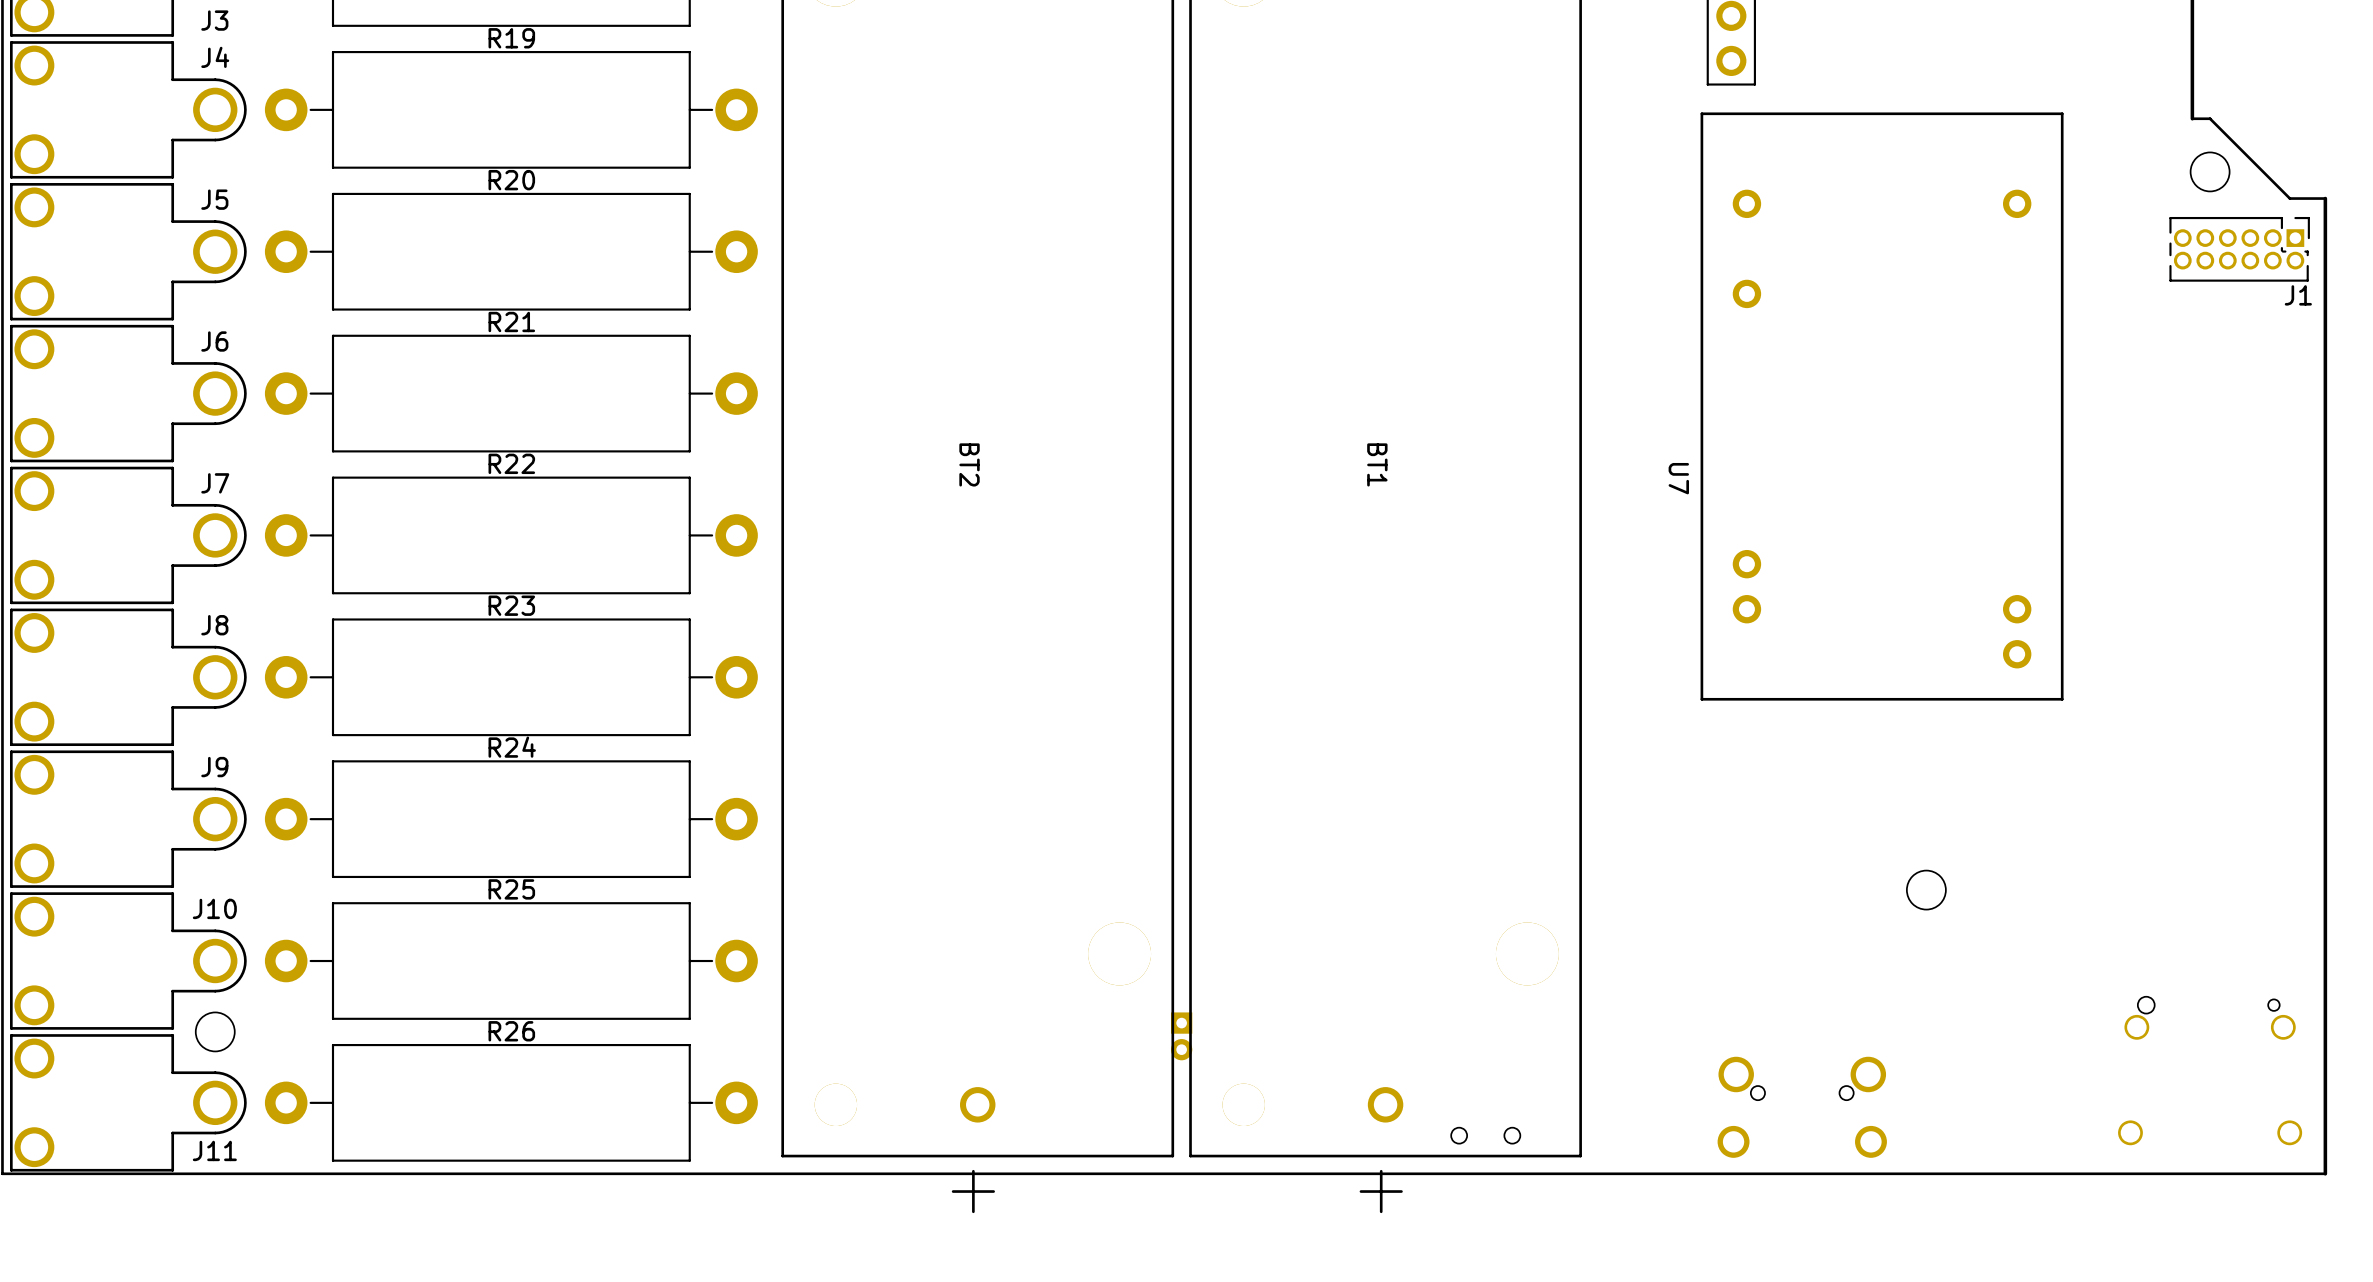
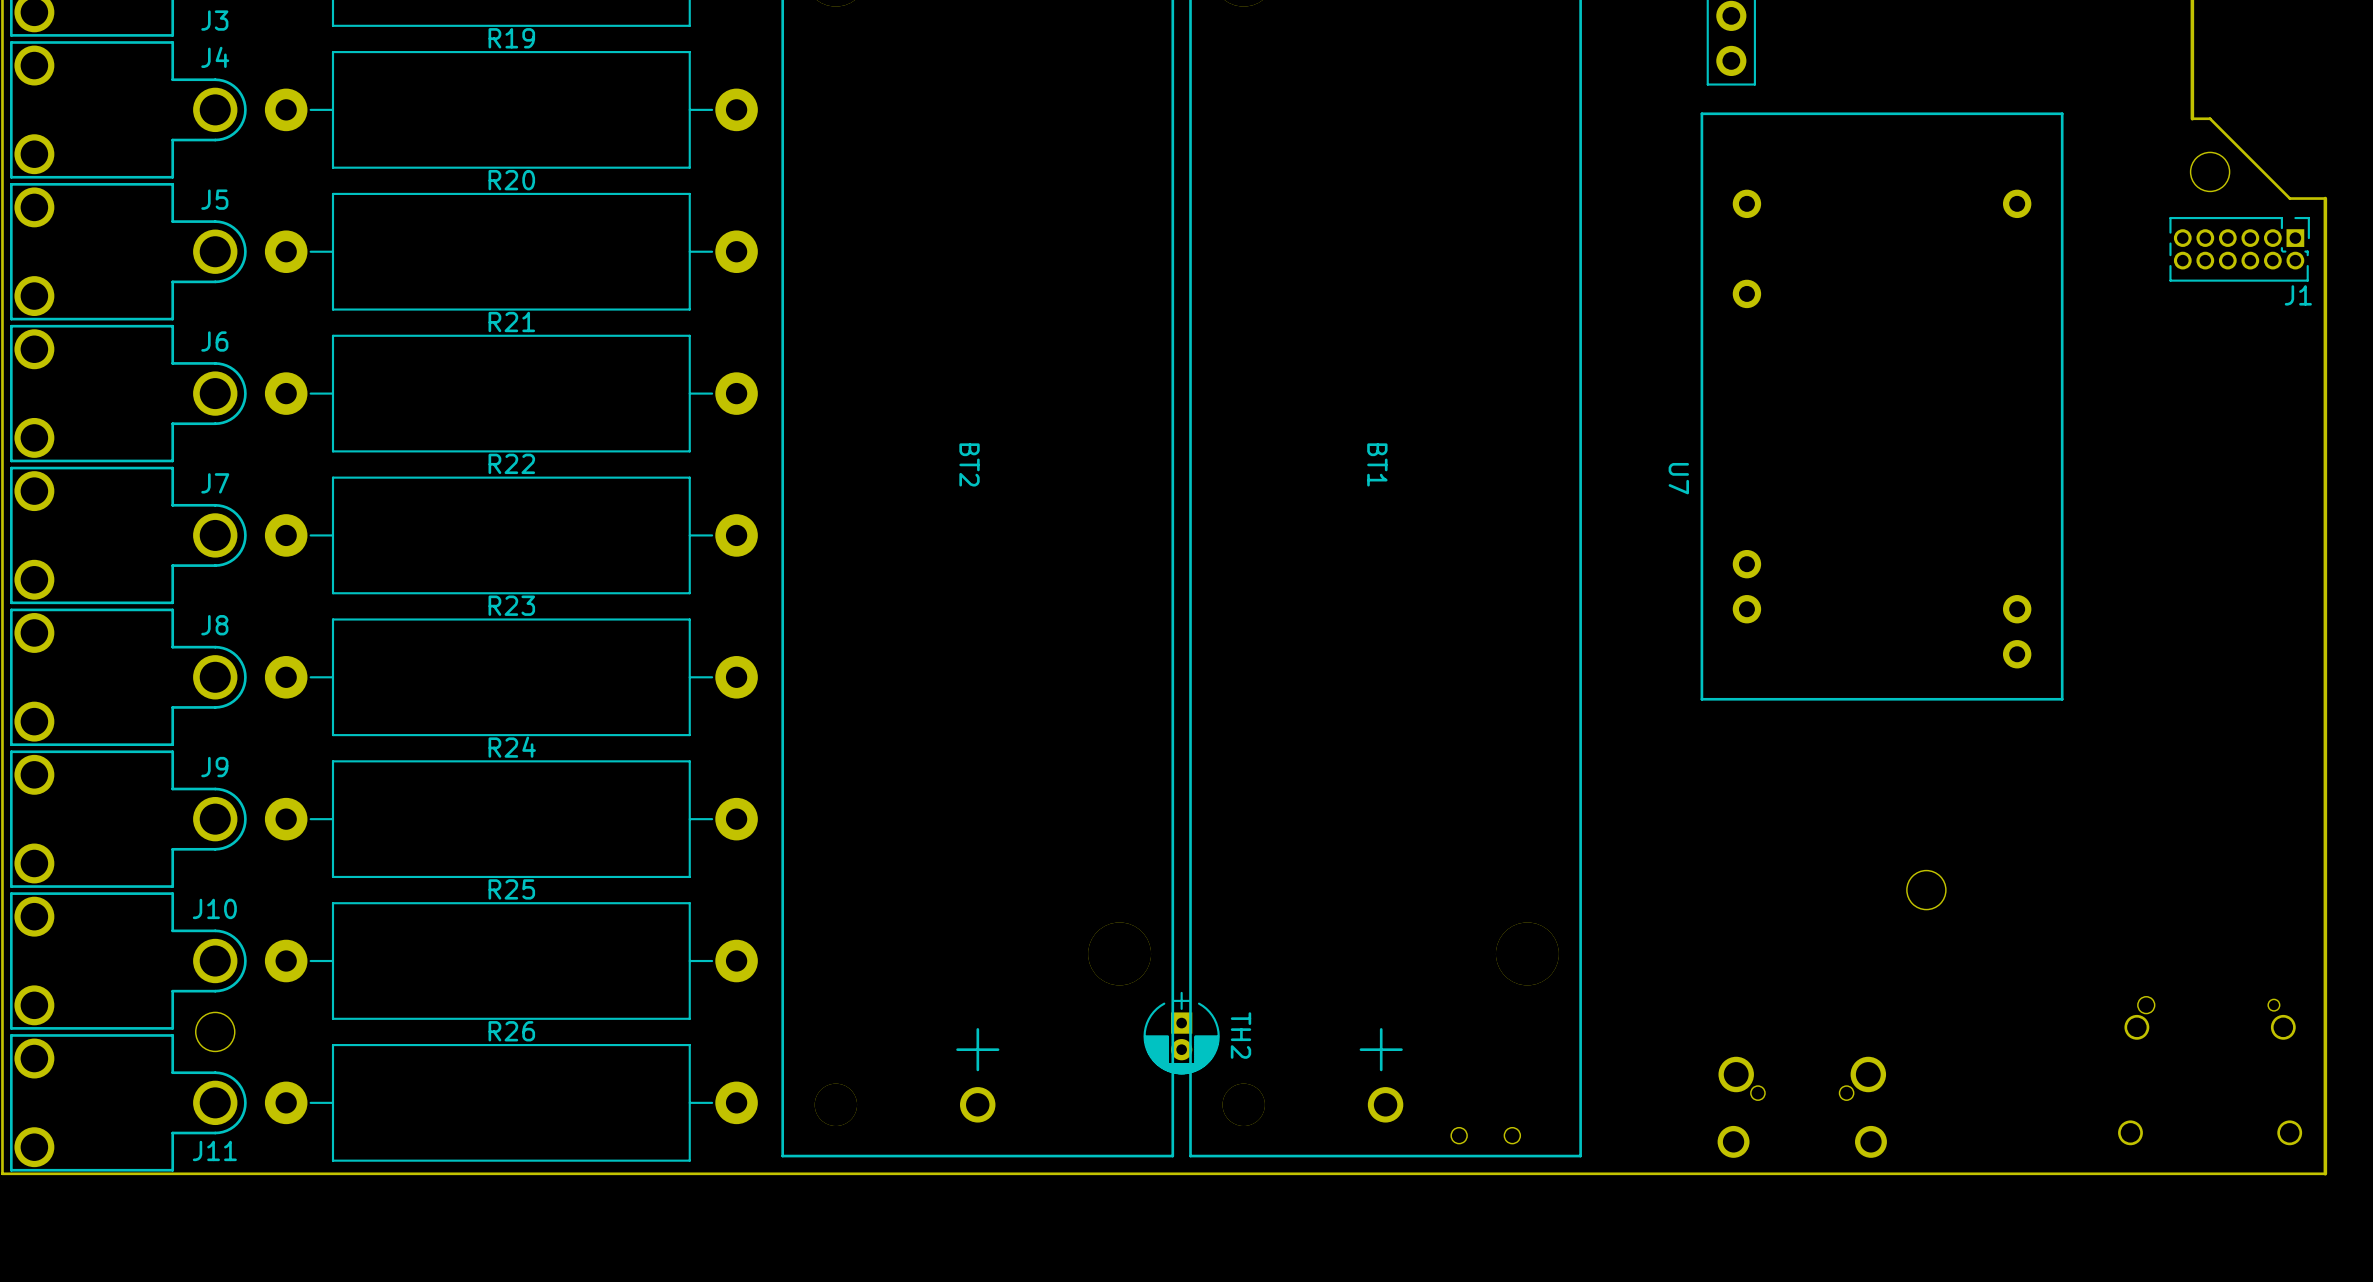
TH2 side: top (1181, 1036) -> bottom (1181, 1033)
BT2 text position: + (973, 1191) -> + (977, 1049)
BT1 text position: + (1381, 1191) -> + (1381, 1049)

